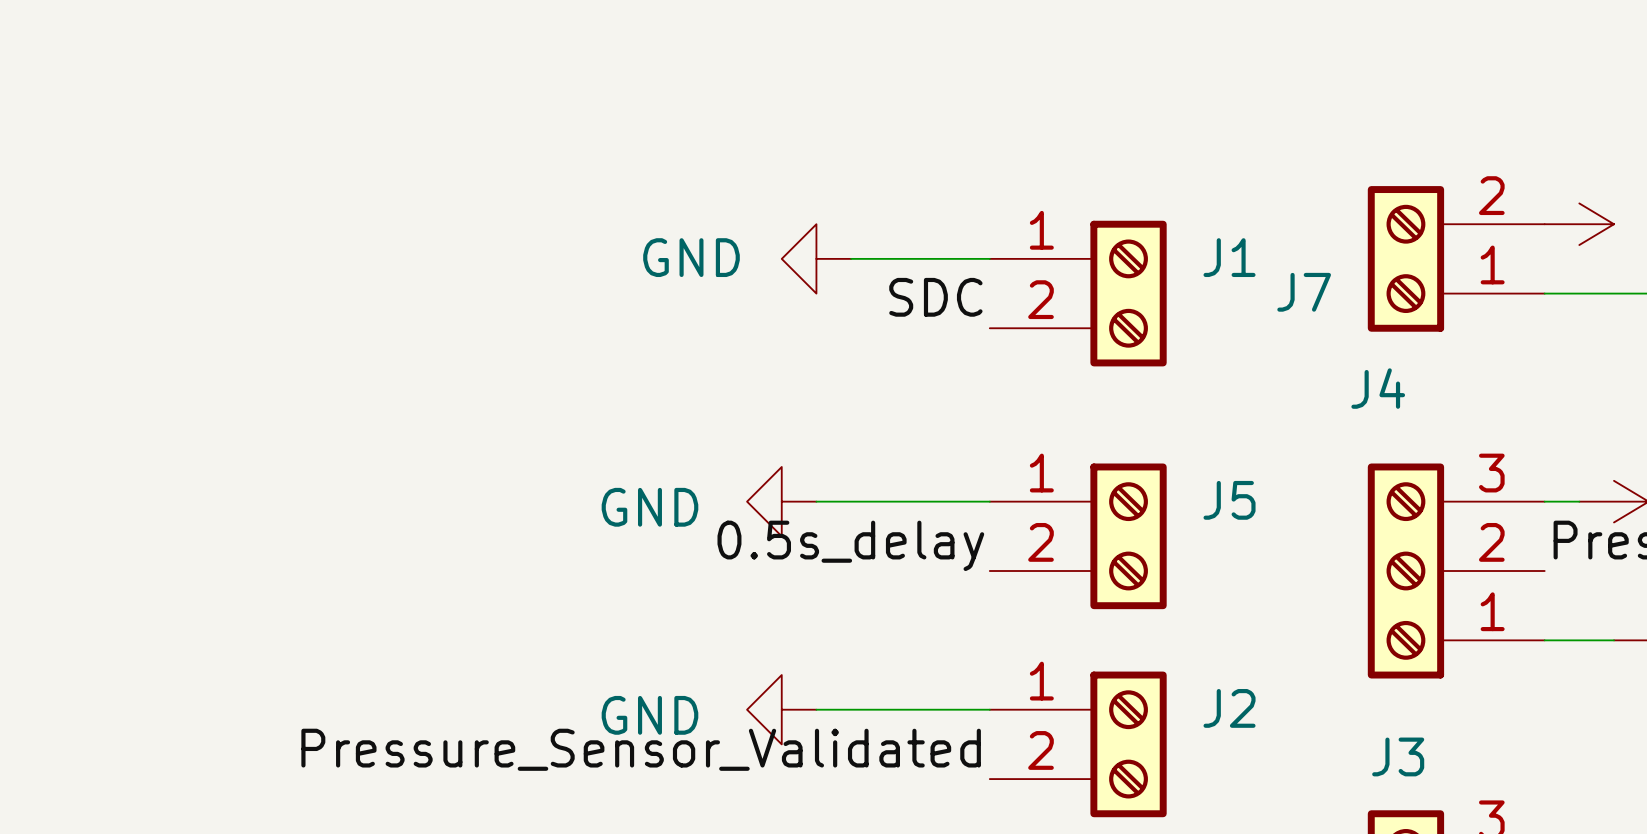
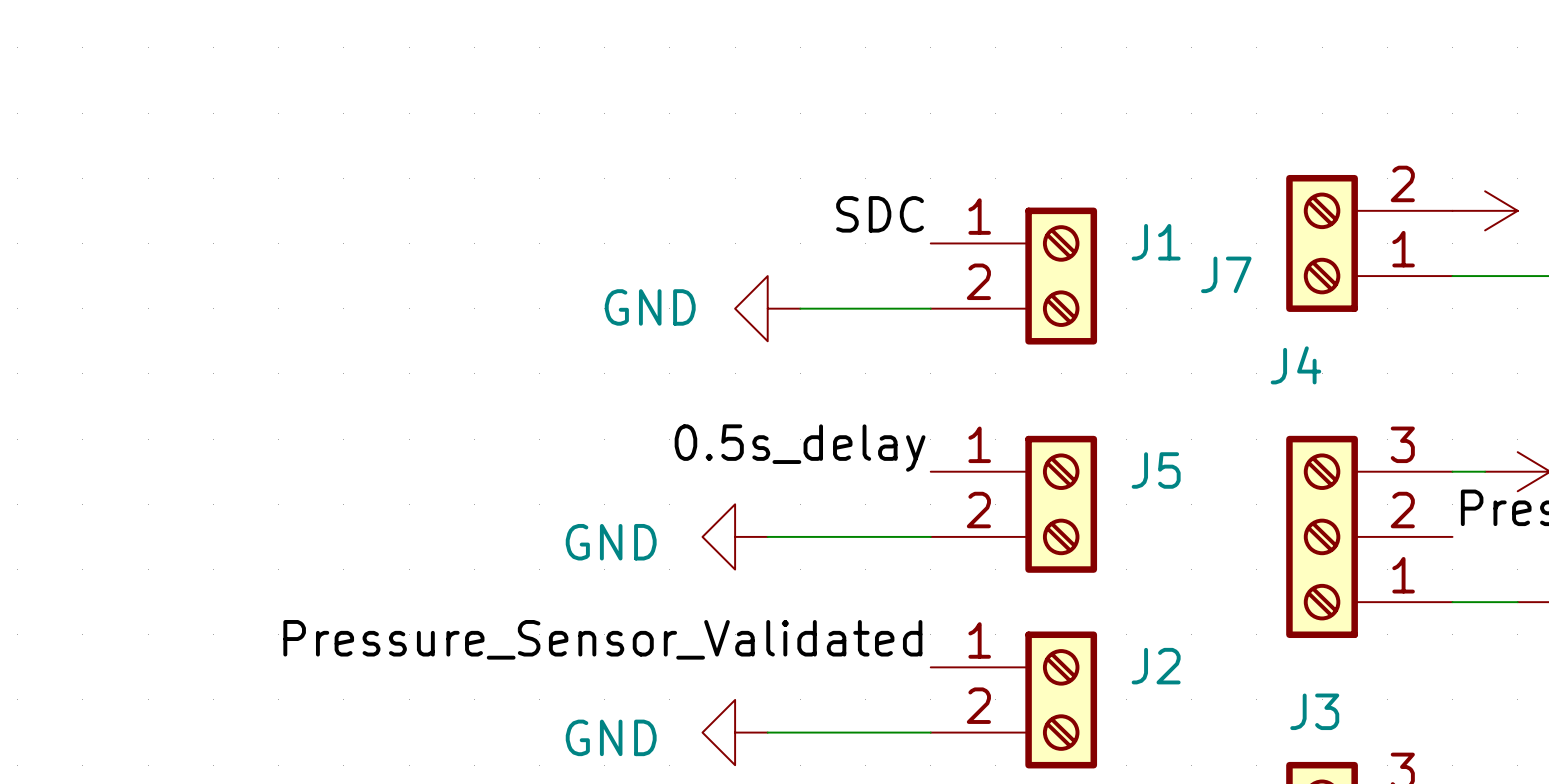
power symbol position: GND (816, 258) -> GND (767, 308)
wire: (851, 258) (989, 258) -> (800, 308) (930, 308)
label position: SDC (935, 297) -> SDC (880, 214)
power symbol: GND (781, 501) -> none
wire: (816, 501) (989, 501) -> (767, 536) (930, 536)
label position: 0.5s_delay (850, 545) -> 0.5s_delay (800, 448)
power symbol: none -> GND (735, 536)
power symbol: GND (781, 709) -> none
wire: (816, 709) (989, 709) -> (767, 732) (930, 732)
label position: Pressure_Sensor_Validated (641, 749) -> Pressure_Sensor_Validated (602, 639)
power symbol: none -> GND (735, 732)

